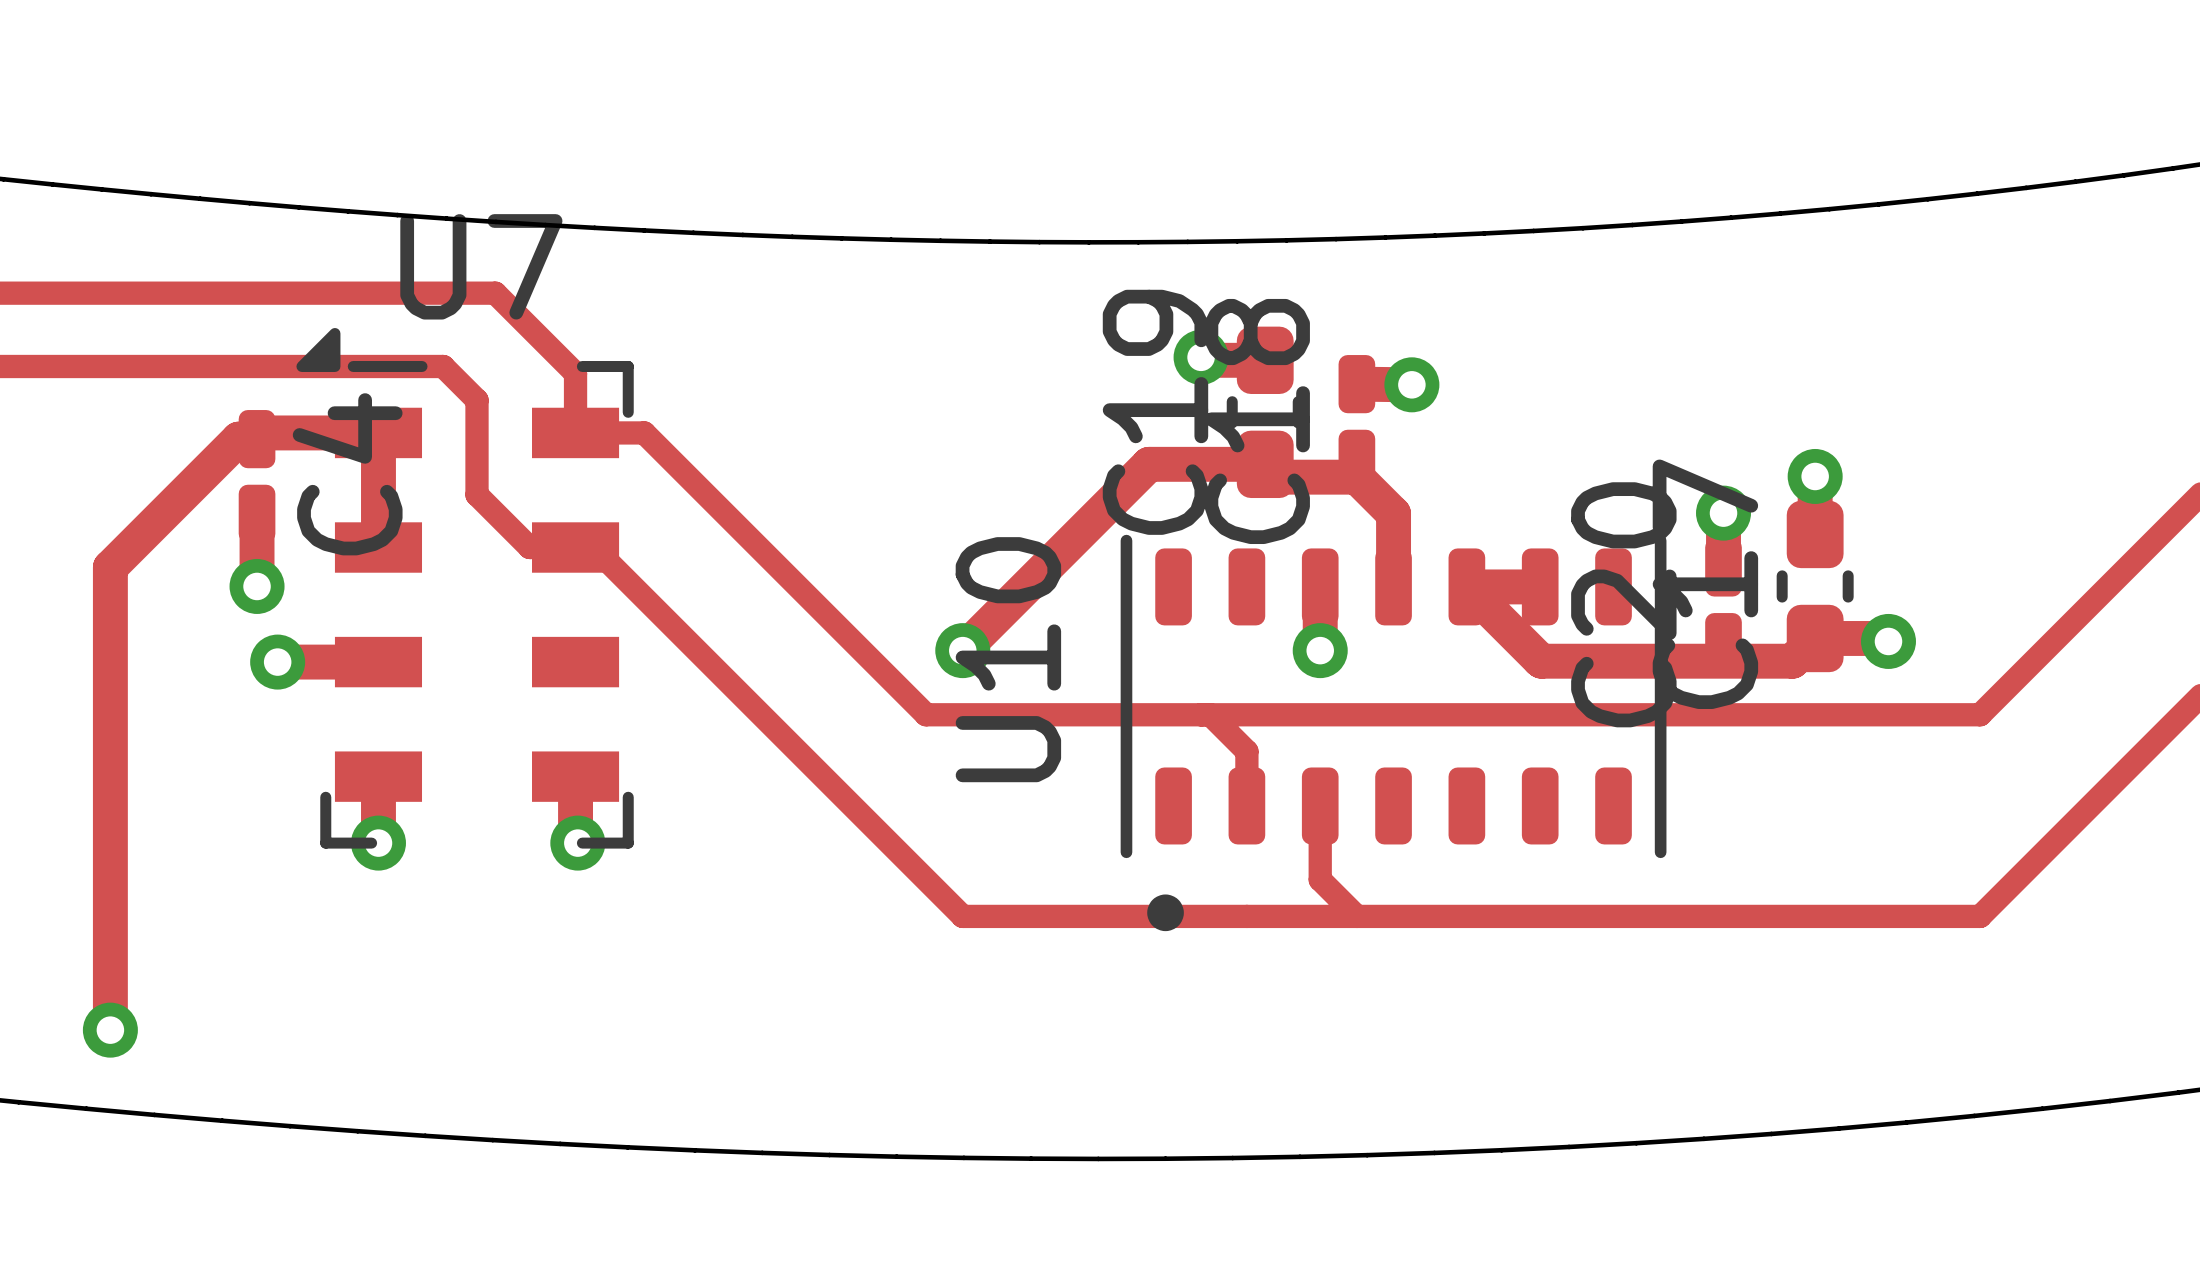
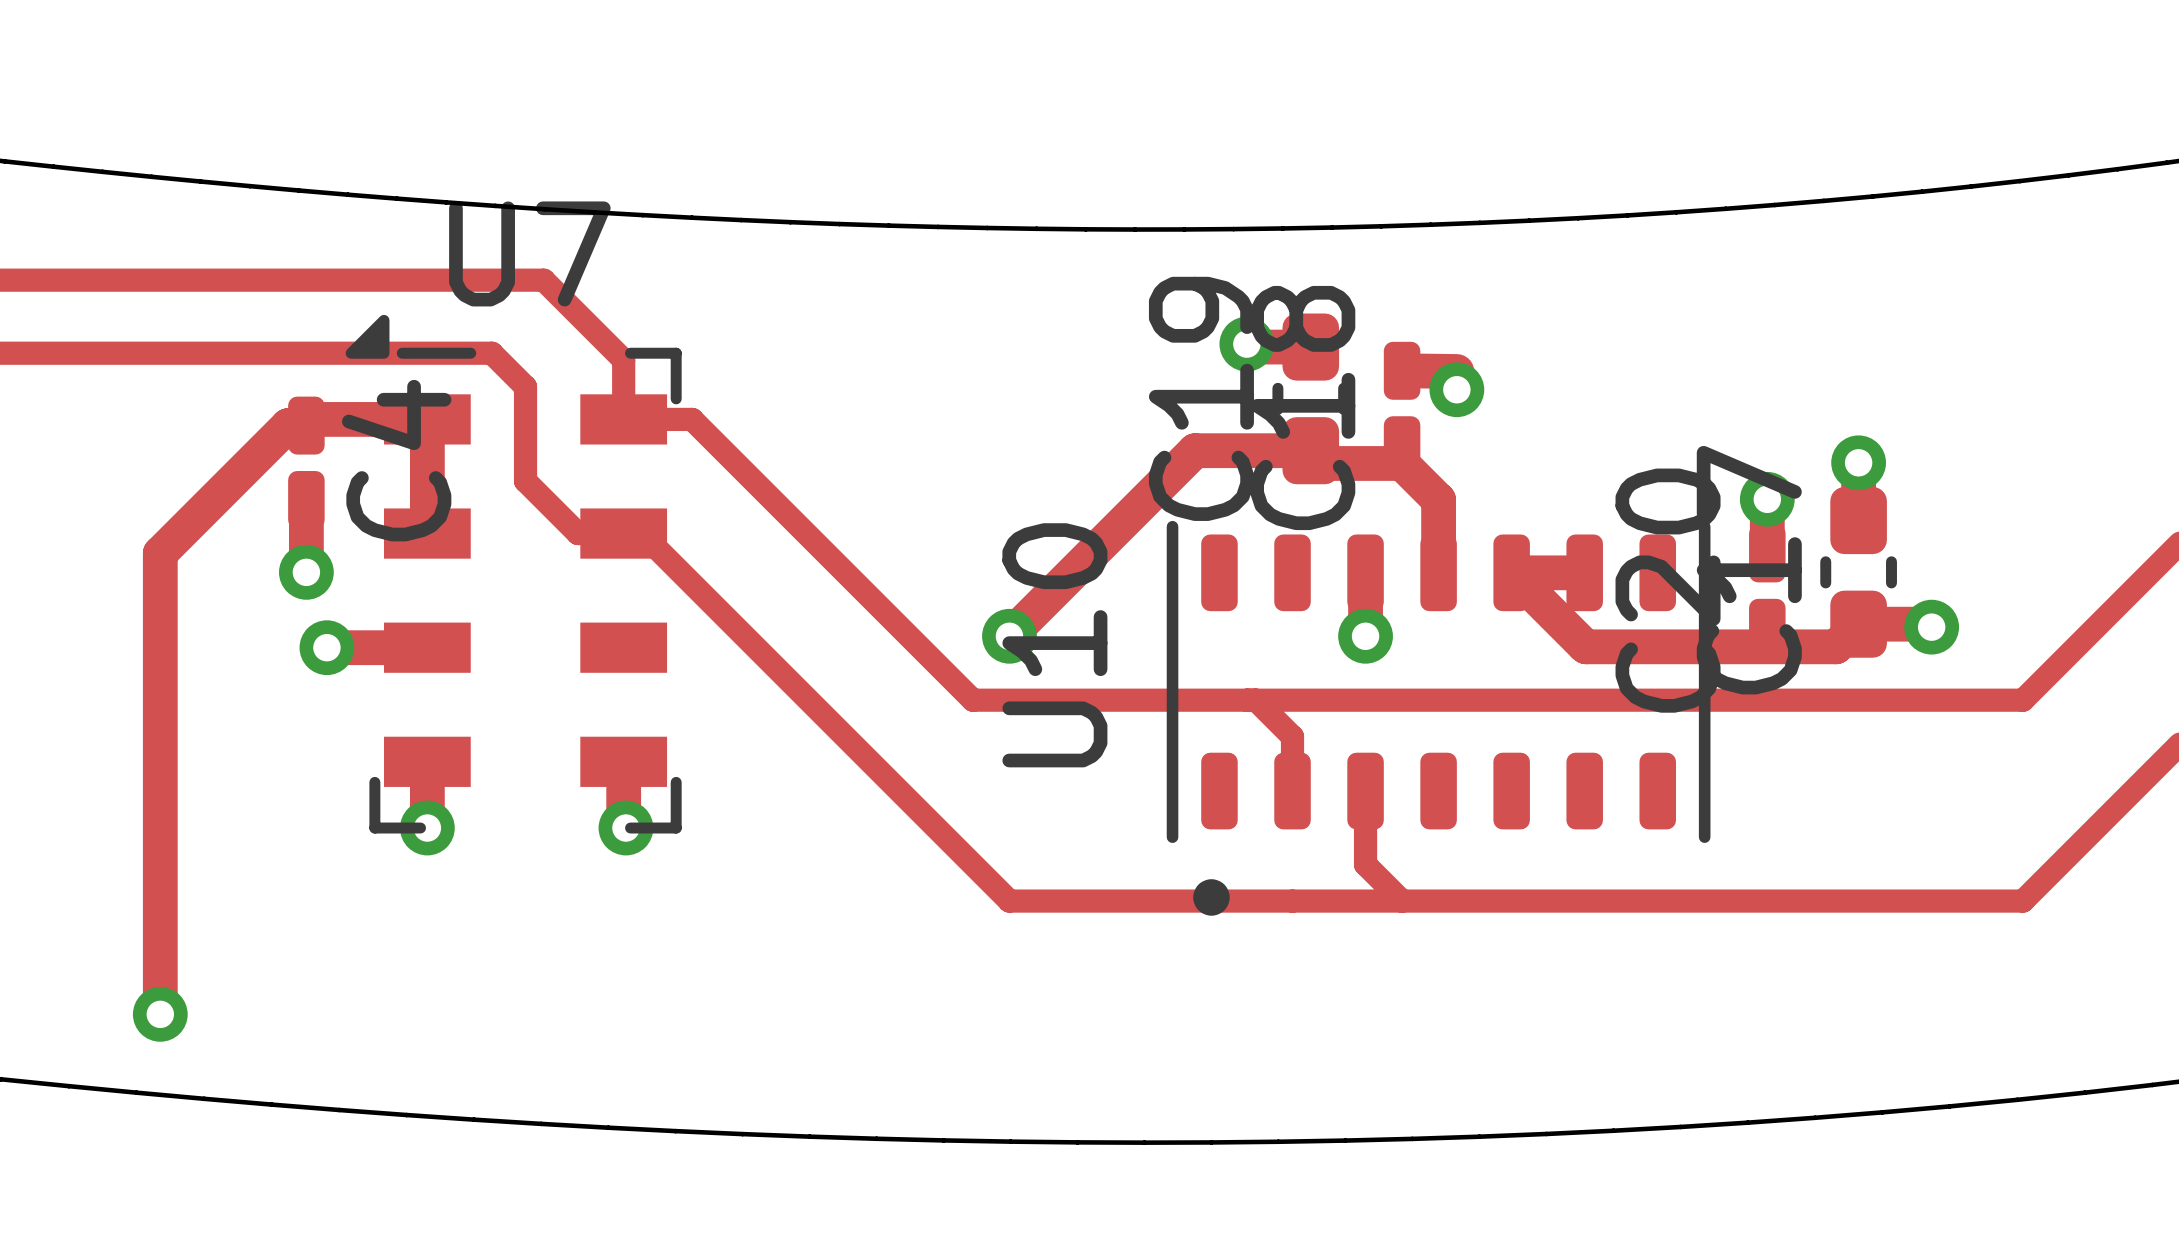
via position: (1411, 384) -> (1456, 389)

